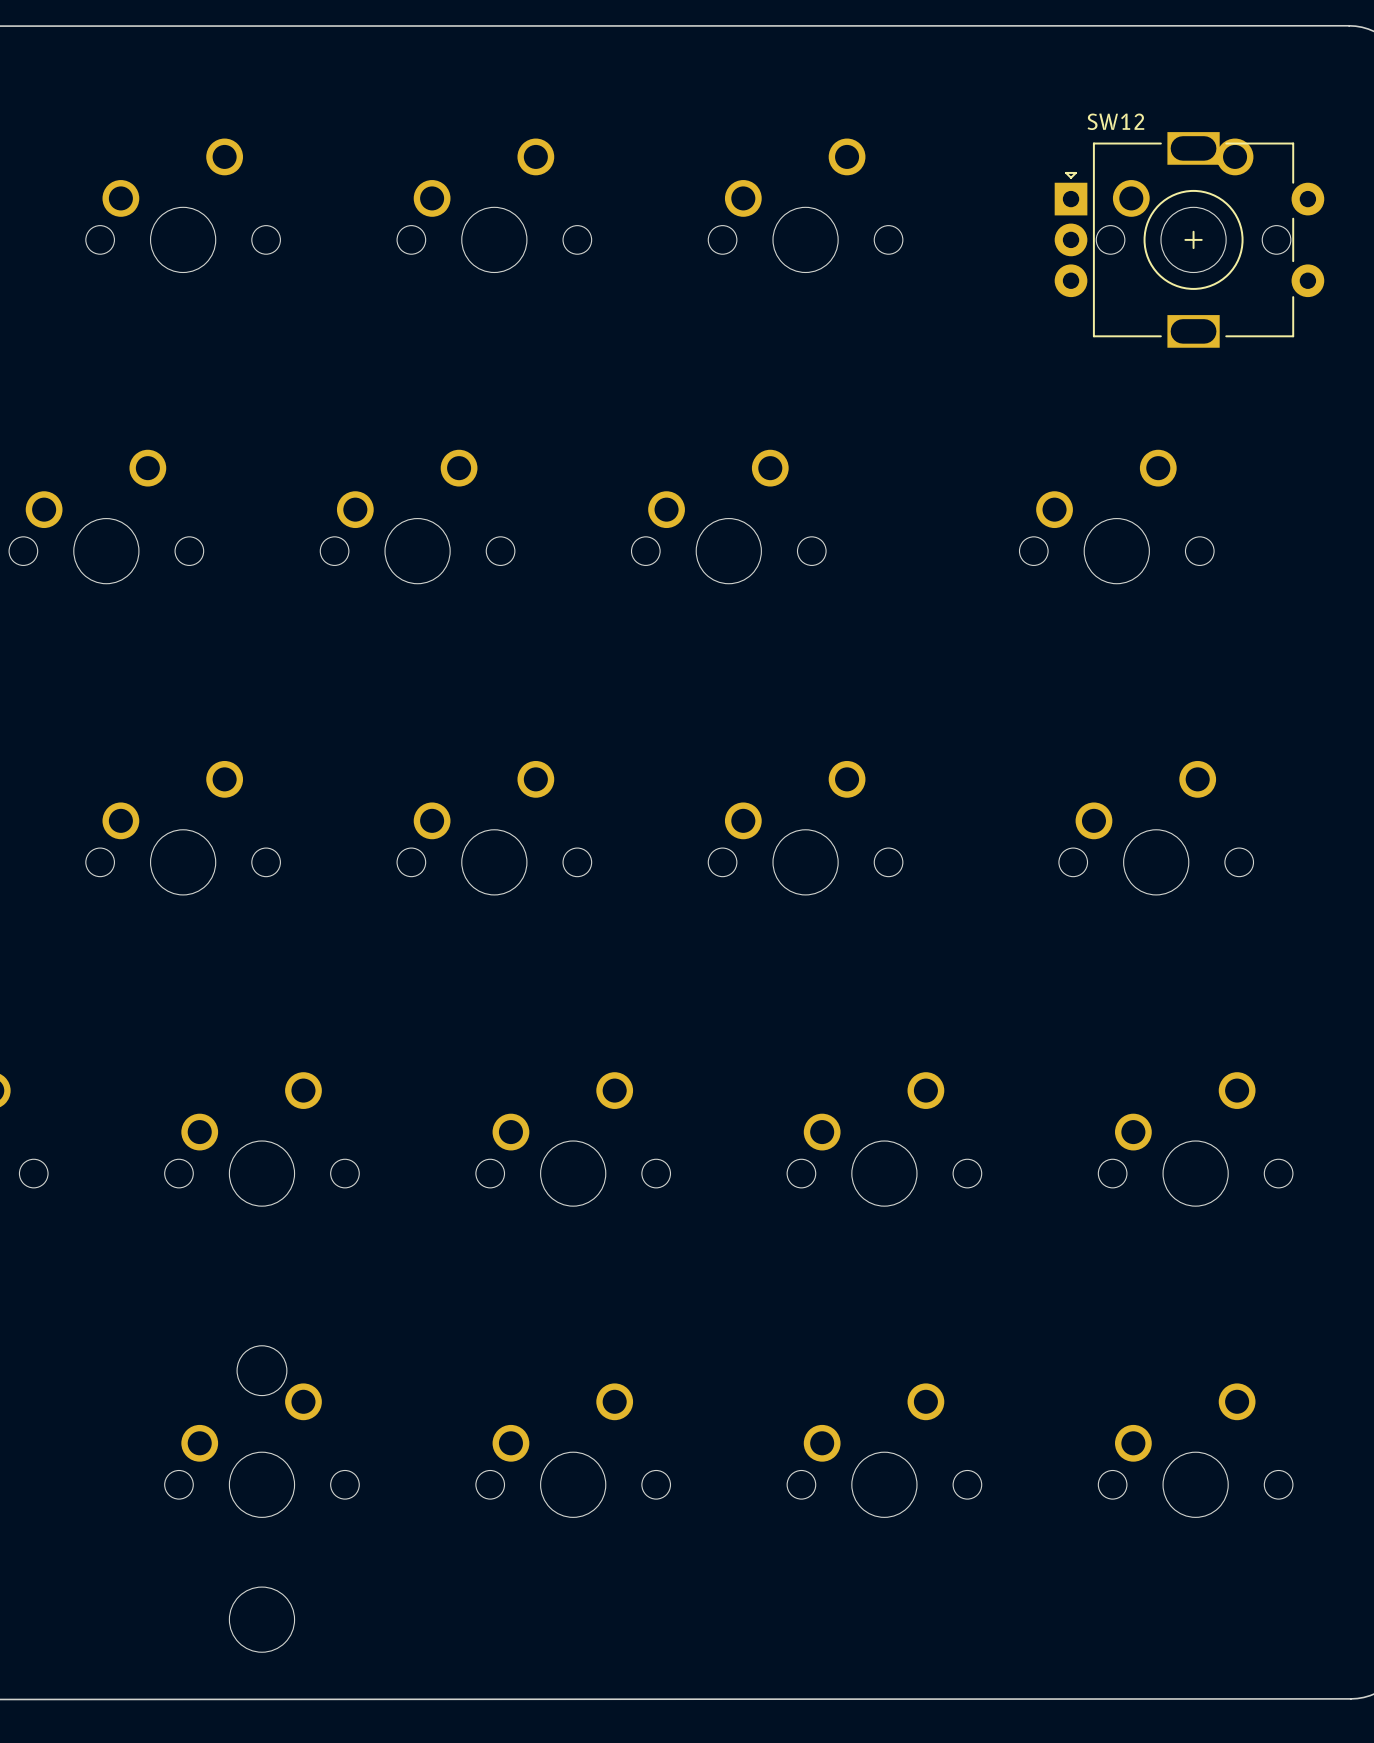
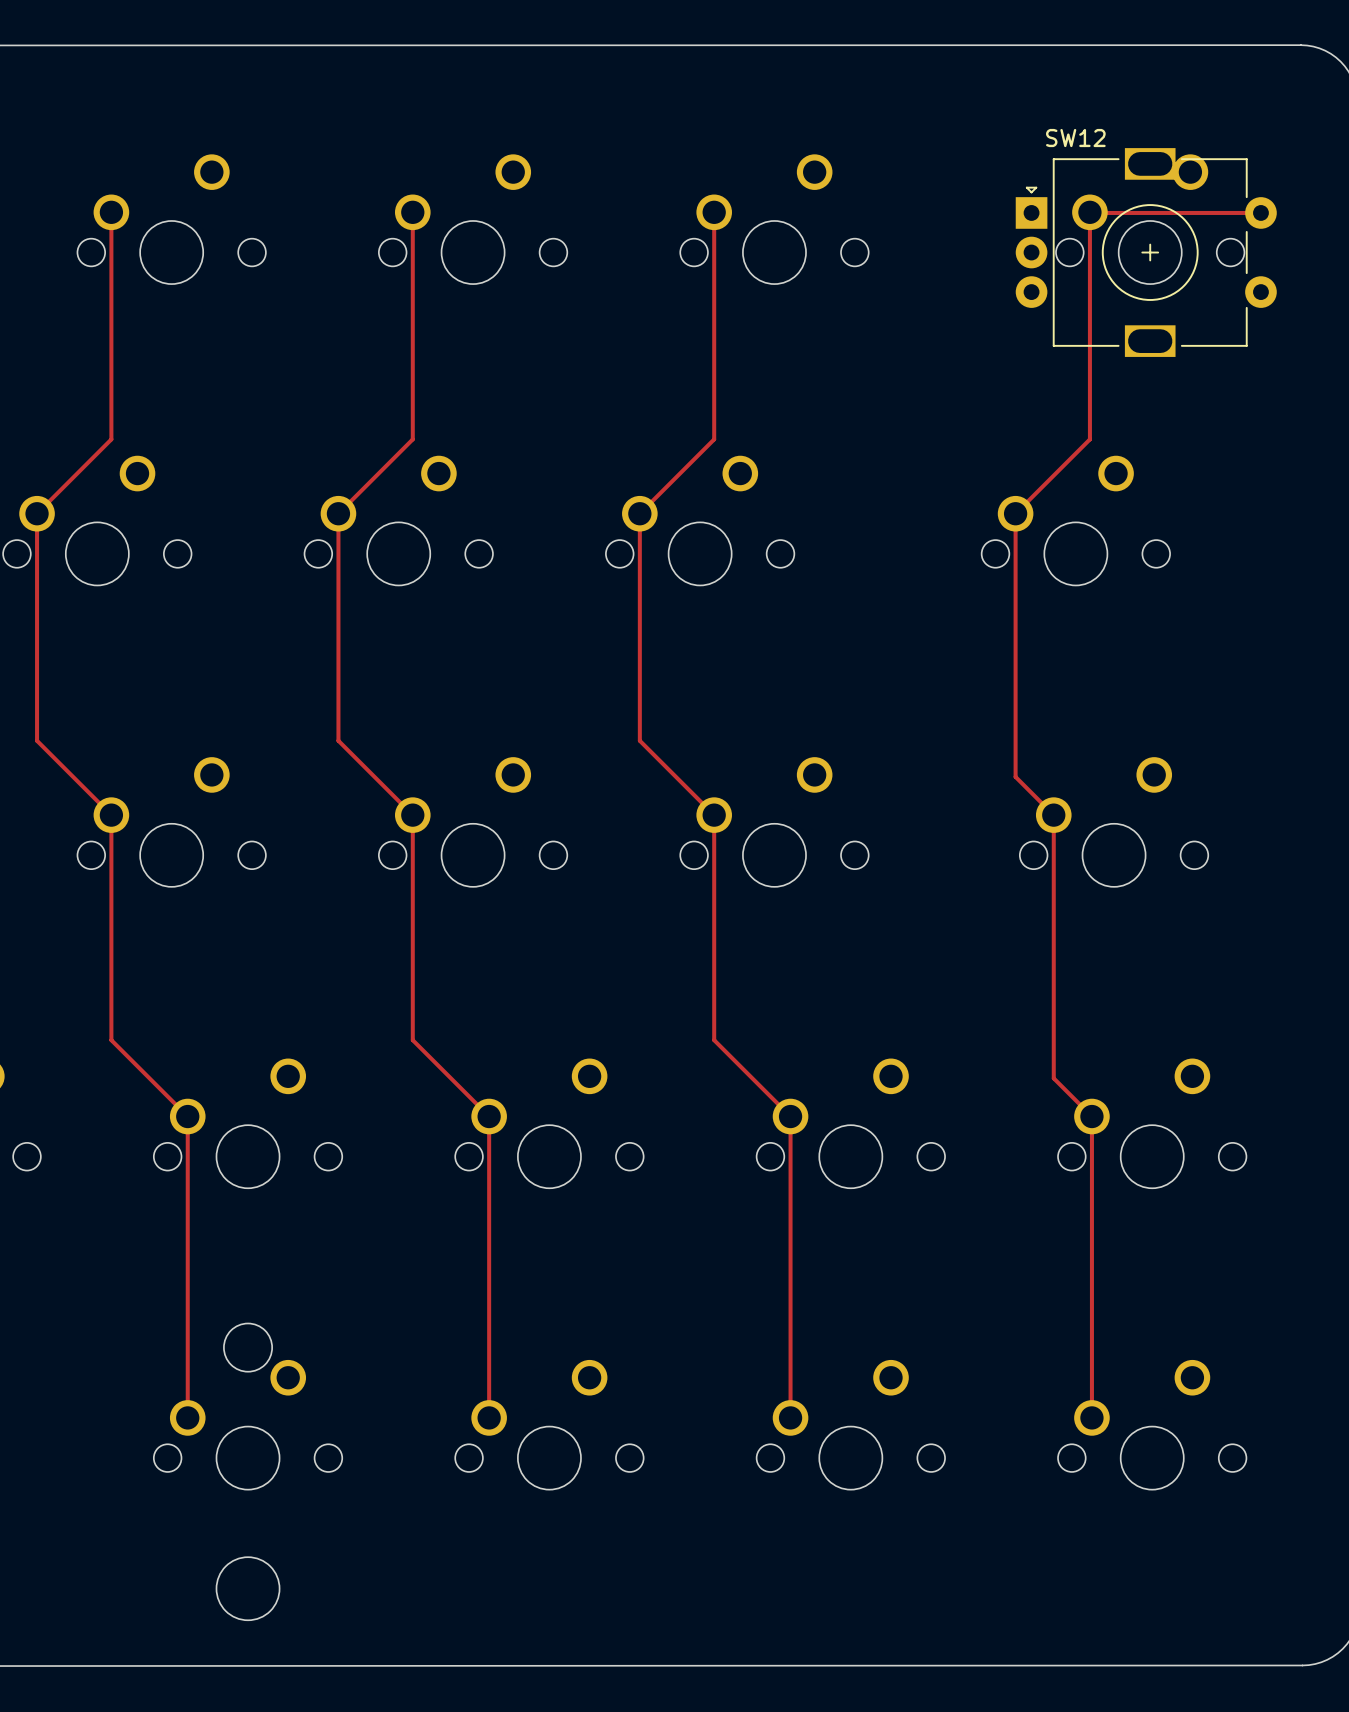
track: none -> (111, 212) (111, 439) (37, 513) (37, 740) (111, 815) (111, 1040) (187, 1116) (187, 1417)
track: none -> (412, 212) (412, 439) (338, 513) (338, 740) (412, 815) (412, 1040) (489, 1116) (489, 1417)
track: none -> (714, 212) (714, 439) (639, 513) (639, 740) (714, 815) (714, 1040) (790, 1116) (790, 1417)
track: none -> (1260, 212) (1089, 212) (1089, 439) (1015, 513) (1015, 776) (1053, 815) (1053, 1078) (1091, 1116) (1091, 1417)

